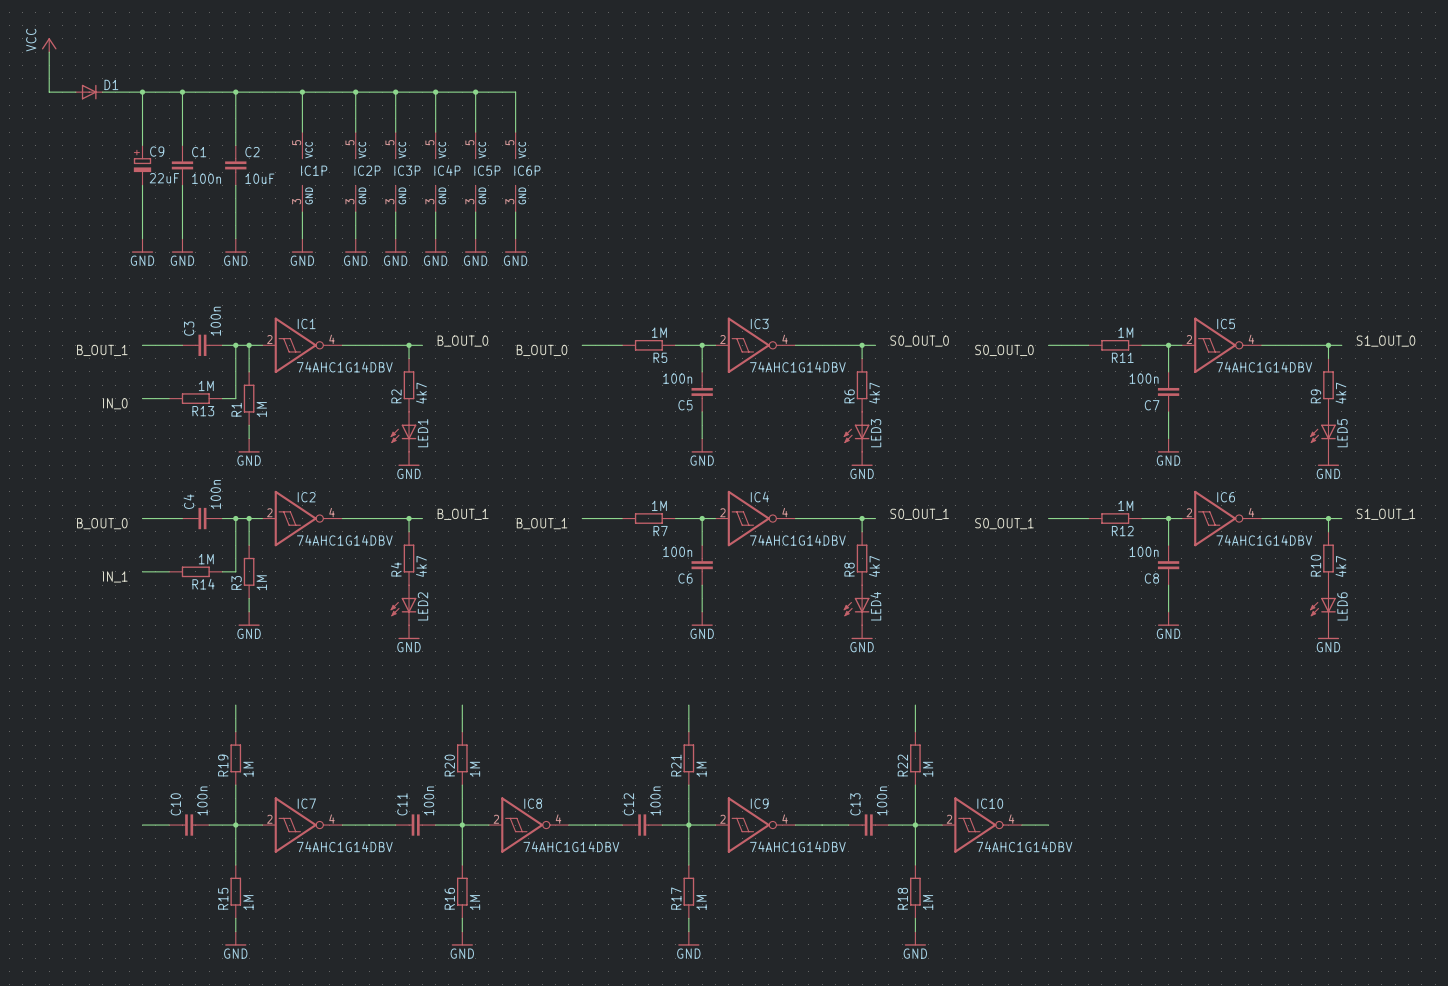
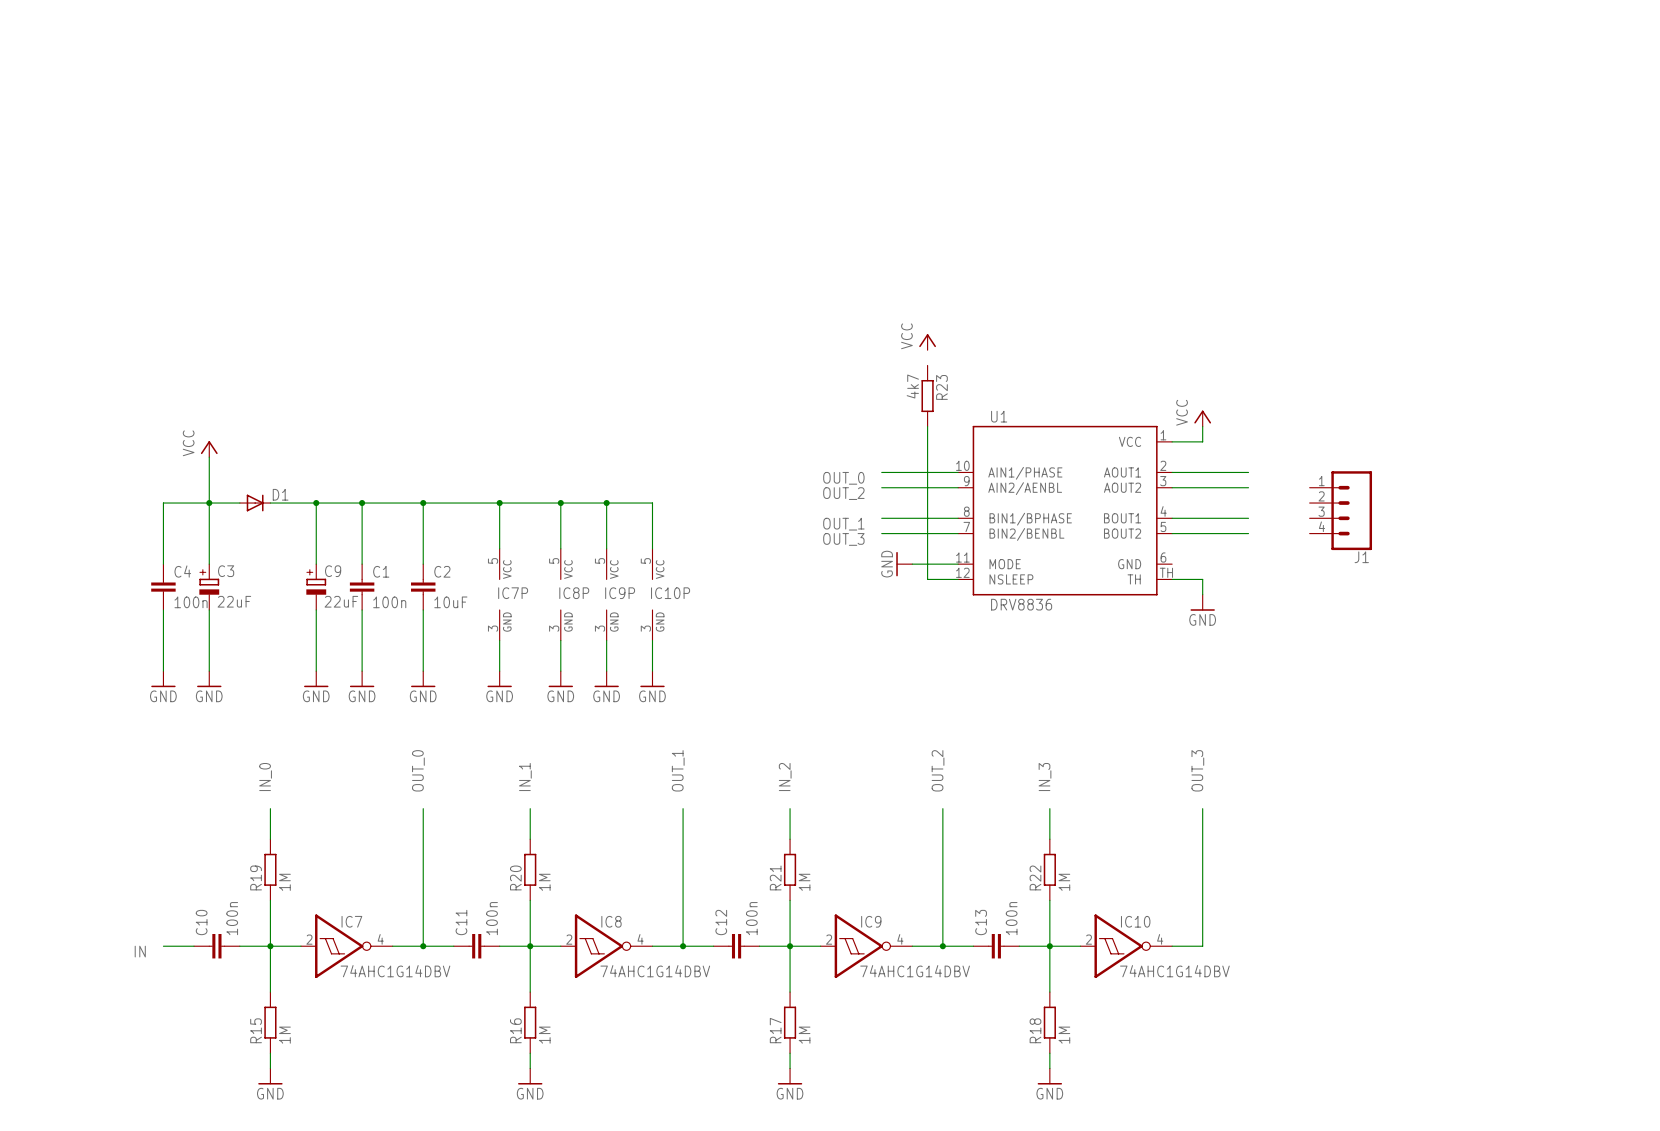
power symbol: VCC (49, 45) -> none
wire: (49, 52) (49, 92) (75, 92) -> none
D1 position: (89, 92) -> (255, 503)
wire: (102, 92) (515, 92) (515, 132) -> none
wire: (142, 92) (142, 145) -> none
junction: (142, 92) -> none
wire: (182, 92) (182, 145) -> none
junction: (182, 92) -> none
wire: (235, 92) (235, 145) -> none
junction: (235, 92) -> none
wire: (302, 92) (302, 132) -> none
junction: (302, 92) -> none
wire: (355, 92) (355, 132) -> none
junction: (355, 92) -> none
wire: (395, 92) (395, 132) -> none
junction: (395, 92) -> none
wire: (435, 92) (435, 132) -> none
junction: (435, 92) -> none
wire: (475, 92) (475, 132) -> none
junction: (475, 92) -> none
C9 position: (142, 165) -> (316, 587)
C1 position: (182, 165) -> (362, 587)
C2 position: (235, 165) -> (423, 587)
IC1P: (302, 172) -> none
IC2P: (355, 172) -> none
IC3P: (395, 172) -> none
IC4P: (435, 172) -> none
IC5P: (475, 172) -> none
IC6P: (515, 172) -> none
wire: (142, 185) (142, 238) -> none
wire: (182, 185) (182, 238) -> none
wire: (235, 185) (235, 238) -> none
wire: (302, 212) (302, 238) -> none
wire: (355, 212) (355, 238) -> none
wire: (395, 212) (395, 238) -> none
wire: (435, 212) (435, 238) -> none
wire: (475, 212) (475, 238) -> none
wire: (515, 212) (515, 238) -> none
power symbol: GND (142, 245) -> none
power symbol: GND (182, 245) -> none
power symbol: GND (235, 245) -> none
power symbol: GND (302, 245) -> none
power symbol: GND (355, 245) -> none
power symbol: GND (395, 245) -> none
power symbol: GND (435, 245) -> none
power symbol: GND (475, 245) -> none
power symbol: GND (515, 245) -> none
power symbol: none -> VCC (927, 342)
C3 value: 100n (215, 321) -> 22uF (234, 601)
C3 name position: C3 (189, 328) -> C3 (226, 571)
C3 symbol: [182, 334, 223, 356] -> [199, 564, 220, 611]
label: B_OUT_0 (462, 341) -> none
label: S0_OUT_0 (919, 341) -> none
label: S1_OUT_0 (1386, 341) -> none
wire: (142, 345) (182, 345) -> none
wire: (222, 345) (262, 345) -> none
wire: (235, 345) (235, 398) (222, 398) -> none
junction: (235, 345) -> none
wire: (249, 345) (249, 371) -> none
junction: (249, 345) -> none
IC1: 74AHC1G14DBV (302, 345) -> none
wire: (342, 345) (422, 345) -> none
wire: (409, 345) (409, 358) -> none
junction: (409, 345) -> none
wire: (582, 345) (622, 345) -> none
R5: 1M (648, 345) -> none
wire: (675, 345) (715, 345) -> none
wire: (702, 345) (702, 371) -> none
junction: (702, 345) -> none
IC3: 74AHC1G14DBV (755, 345) -> none
wire: (795, 345) (875, 345) -> none
R23: none -> 4k7 (927, 396)
wire: (862, 345) (862, 358) -> none
junction: (862, 345) -> none
wire: (1048, 345) (1088, 345) -> none
R11: 1M (1115, 345) -> none
wire: (1141, 345) (1181, 345) -> none
wire: (1168, 345) (1168, 371) -> none
junction: (1168, 345) -> none
IC5: 74AHC1G14DBV (1221, 345) -> none
wire: (1261, 345) (1341, 345) -> none
wire: (1328, 345) (1328, 358) -> none
junction: (1328, 345) -> none
label: B_OUT_1 (102, 350) -> none
label: B_OUT_0 (542, 350) -> none
label: S0_OUT_0 (1004, 350) -> none
power symbol: none -> VCC (1202, 418)
wire: none -> (927, 426) (927, 579) (958, 579)
wire: none -> (1202, 426) (1202, 441) (1172, 441)
R2: 4k7 (409, 385) -> none
R6: 4k7 (862, 385) -> none
R9: 4k7 (1328, 385) -> none
power symbol: none -> VCC (209, 449)
C5: 100n (702, 391) -> none
C7: 100n (1168, 391) -> none
wire: (142, 398) (169, 398) -> none
wire: none -> (209, 457) (209, 564)
R13: 1M (195, 398) -> none
R1: 1M (249, 398) -> none
label: IN_0 (115, 403) -> none
wire: (702, 411) (702, 438) -> none
wire: none -> (881, 472) (958, 472)
wire: none -> (1172, 472) (1248, 472)
wire: (1168, 411) (1168, 438) -> none
label: none -> OUT_0 (843, 478)
wire: (249, 425) (249, 438) -> none
wire: none -> (881, 487) (958, 487)
wire: none -> (1172, 487) (1248, 487)
label: none -> OUT_2 (843, 493)
LED1: (403, 431) -> none
LED3: (856, 431) -> none
LED5: (1322, 431) -> none
junction: none -> (209, 503)
wire: none -> (239, 503) (163, 503) (163, 564)
wire: none -> (270, 503) (652, 503) (652, 548)
wire: none -> (316, 503) (316, 564)
junction: none -> (316, 503)
wire: none -> (362, 503) (362, 564)
junction: none -> (362, 503)
wire: none -> (423, 503) (423, 564)
junction: none -> (423, 503)
wire: none -> (499, 503) (499, 548)
junction: none -> (499, 503)
wire: none -> (560, 503) (560, 548)
junction: none -> (560, 503)
wire: none -> (606, 503) (606, 548)
junction: none -> (606, 503)
power symbol: GND (249, 445) -> none
power symbol: GND (702, 445) -> none
U1: none -> DRV8836 (1065, 510)
power symbol: GND (1168, 445) -> none
J1: none -> (1340, 510)
wire: none -> (881, 518) (958, 518)
wire: none -> (1172, 518) (1248, 518)
label: none -> OUT_1 (843, 524)
power symbol: GND (409, 458) -> none
power symbol: GND (862, 458) -> none
power symbol: GND (1328, 458) -> none
wire: none -> (881, 533) (958, 533)
wire: none -> (1172, 533) (1248, 533)
label: none -> OUT_3 (843, 539)
power symbol: none -> GND (904, 564)
label: B_OUT_1 (462, 514) -> none
label: S0_OUT_1 (919, 514) -> none
label: S1_OUT_1 (1386, 514) -> none
wire: (142, 518) (182, 518) -> none
C4 rotation: 0° (202, 518) -> 90° clockwise (163, 587)
C4 position: (202, 518) -> (163, 587)
wire: (222, 518) (262, 518) -> none
wire: (235, 518) (235, 571) (222, 571) -> none
junction: (235, 518) -> none
wire: (249, 518) (249, 545) -> none
junction: (249, 518) -> none
IC2: 74AHC1G14DBV (302, 518) -> none
wire: (342, 518) (422, 518) -> none
wire: (409, 518) (409, 531) -> none
junction: (409, 518) -> none
IC7P: none -> (499, 594)
IC8P: none -> (560, 594)
IC9P: none -> (606, 594)
IC10P: none -> (652, 594)
wire: (582, 518) (622, 518) -> none
R7: 1M (648, 518) -> none
wire: (675, 518) (715, 518) -> (912, 564) (958, 564)
wire: (702, 518) (702, 545) -> none
junction: (702, 518) -> none
IC4: 74AHC1G14DBV (755, 518) -> none
wire: (795, 518) (875, 518) -> none
wire: (862, 518) (862, 531) -> none
junction: (862, 518) -> none
wire: (1048, 518) (1088, 518) -> (1202, 594) (1202, 579) (1172, 579)
R12: 1M (1115, 518) -> none
wire: (1141, 518) (1181, 518) -> none
wire: (1168, 518) (1168, 545) -> none
junction: (1168, 518) -> none
IC6: 74AHC1G14DBV (1221, 518) -> none
wire: (1261, 518) (1341, 518) -> none
wire: (1328, 518) (1328, 531) -> none
junction: (1328, 518) -> none
label: B_OUT_0 (102, 523) -> none
label: B_OUT_1 (542, 523) -> none
label: S0_OUT_1 (1004, 523) -> none
power symbol: none -> GND (1202, 602)
wire: none -> (163, 610) (163, 671)
wire: none -> (209, 610) (209, 671)
wire: none -> (316, 610) (316, 671)
wire: none -> (362, 610) (362, 671)
wire: none -> (423, 610) (423, 671)
R4: 4k7 (409, 558) -> none
wire: none -> (499, 640) (499, 671)
wire: none -> (560, 640) (560, 671)
wire: none -> (606, 640) (606, 671)
wire: none -> (652, 640) (652, 671)
R8: 4k7 (862, 558) -> none
R10: 4k7 (1328, 558) -> none
C6: 100n (702, 565) -> none
C8: 100n (1168, 565) -> none
wire: (142, 571) (169, 571) -> none
R14: 1M (195, 571) -> none
R3: 1M (249, 571) -> none
label: IN_1 (115, 576) -> none
wire: (702, 585) (702, 611) -> none
wire: (1168, 585) (1168, 611) -> none
power symbol: none -> GND (163, 679)
power symbol: none -> GND (209, 679)
power symbol: none -> GND (316, 679)
power symbol: none -> GND (362, 679)
power symbol: none -> GND (423, 679)
power symbol: none -> GND (499, 679)
power symbol: none -> GND (560, 679)
power symbol: none -> GND (606, 679)
power symbol: none -> GND (652, 679)
wire: (249, 598) (249, 611) -> none
LED2: (403, 605) -> none
LED4: (856, 605) -> none
LED6: (1322, 605) -> none
power symbol: GND (249, 618) -> none
power symbol: GND (702, 618) -> none
power symbol: GND (1168, 618) -> none
power symbol: GND (409, 632) -> none
power symbol: GND (862, 632) -> none
power symbol: GND (1328, 632) -> none
label: none -> OUT_0 (418, 770)
label: none -> OUT_1 (678, 770)
label: none -> OUT_2 (938, 770)
label: none -> OUT_3 (1197, 770)
label: none -> IN_0 (265, 777)
label: none -> IN_1 (525, 777)
label: none -> IN_2 (785, 777)
label: none -> IN_3 (1045, 777)
wire: none -> (423, 808) (423, 946)
wire: none -> (683, 808) (683, 946)
wire: none -> (942, 808) (942, 946)
wire: none -> (1202, 808) (1202, 946)
junction: none -> (423, 946)
junction: none -> (683, 946)
junction: none -> (942, 946)
label: none -> IN (140, 951)

